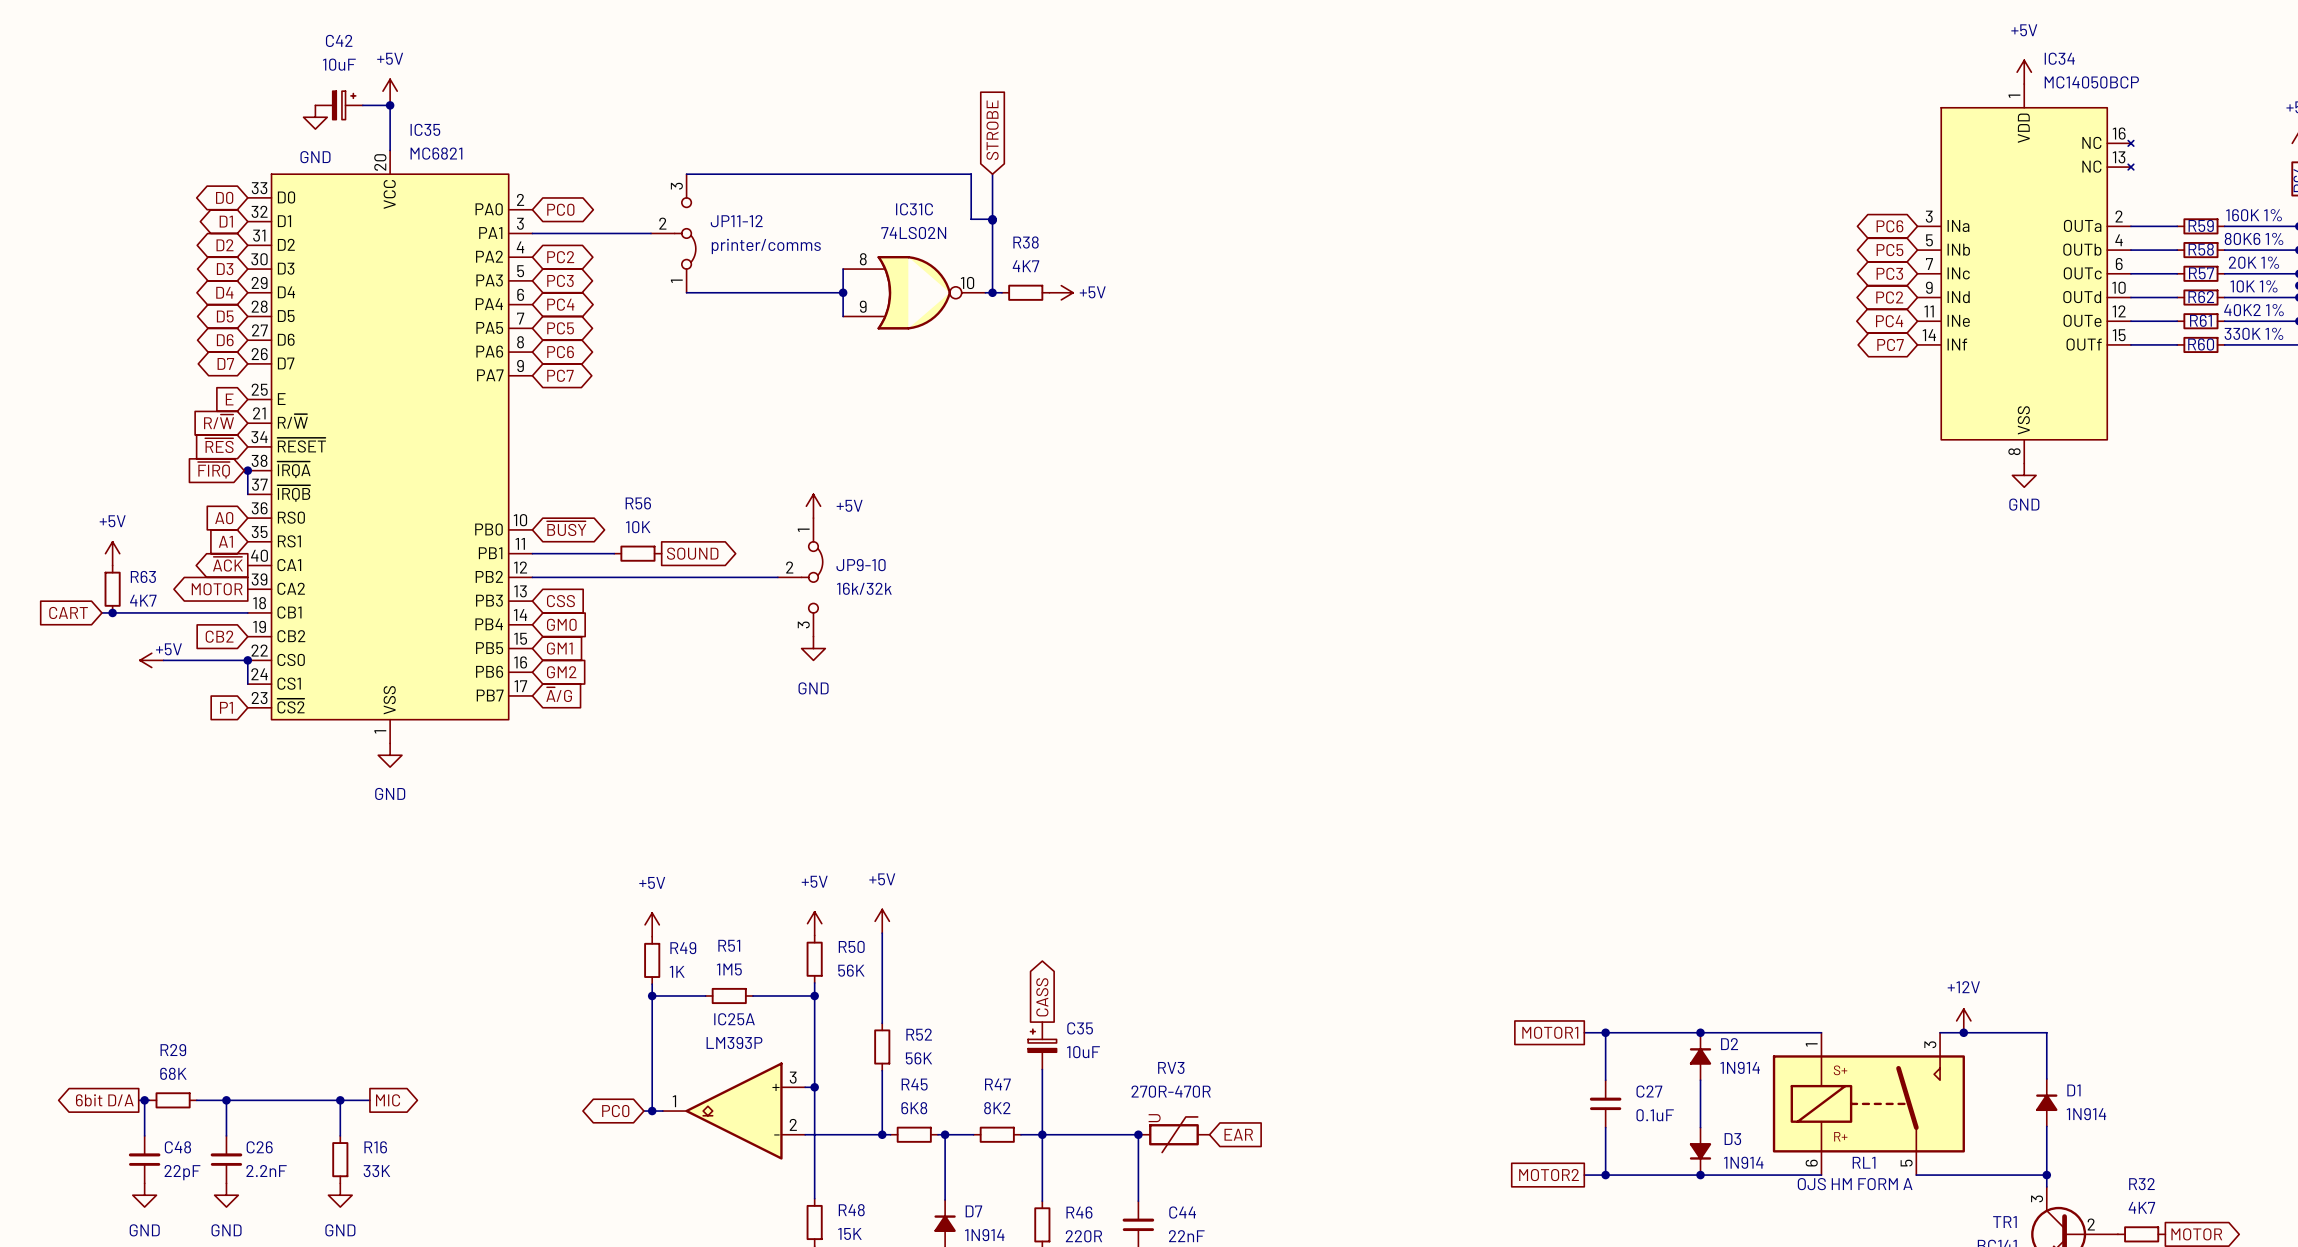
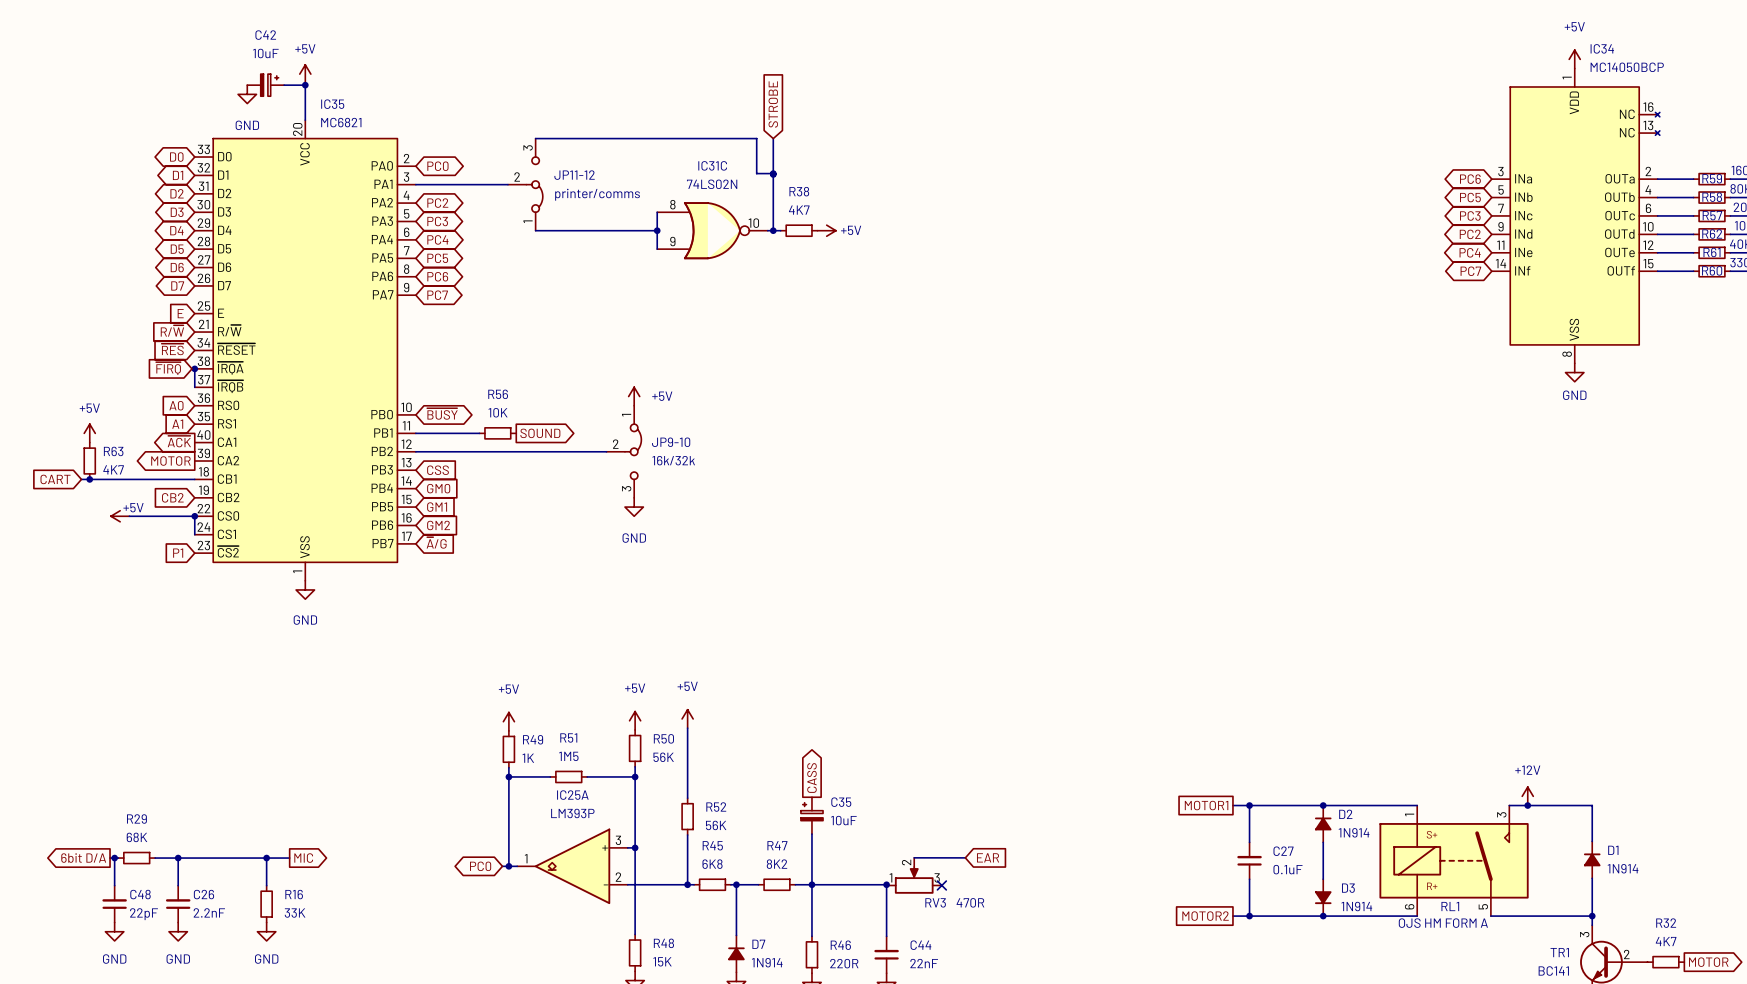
RV3 name position: RV3 (1171, 1067) -> RV3 (935, 902)
RV3 value: 270R-470R (1171, 1091) -> 470R (970, 902)
wire: none -> (914, 857) (965, 857)
RV3 symbol: [1138, 1116, 1210, 1153] -> [886, 857, 942, 894]
global label position: EAR (1238, 1134) -> EAR (988, 857)
no-connect mark: none -> (941, 885)

